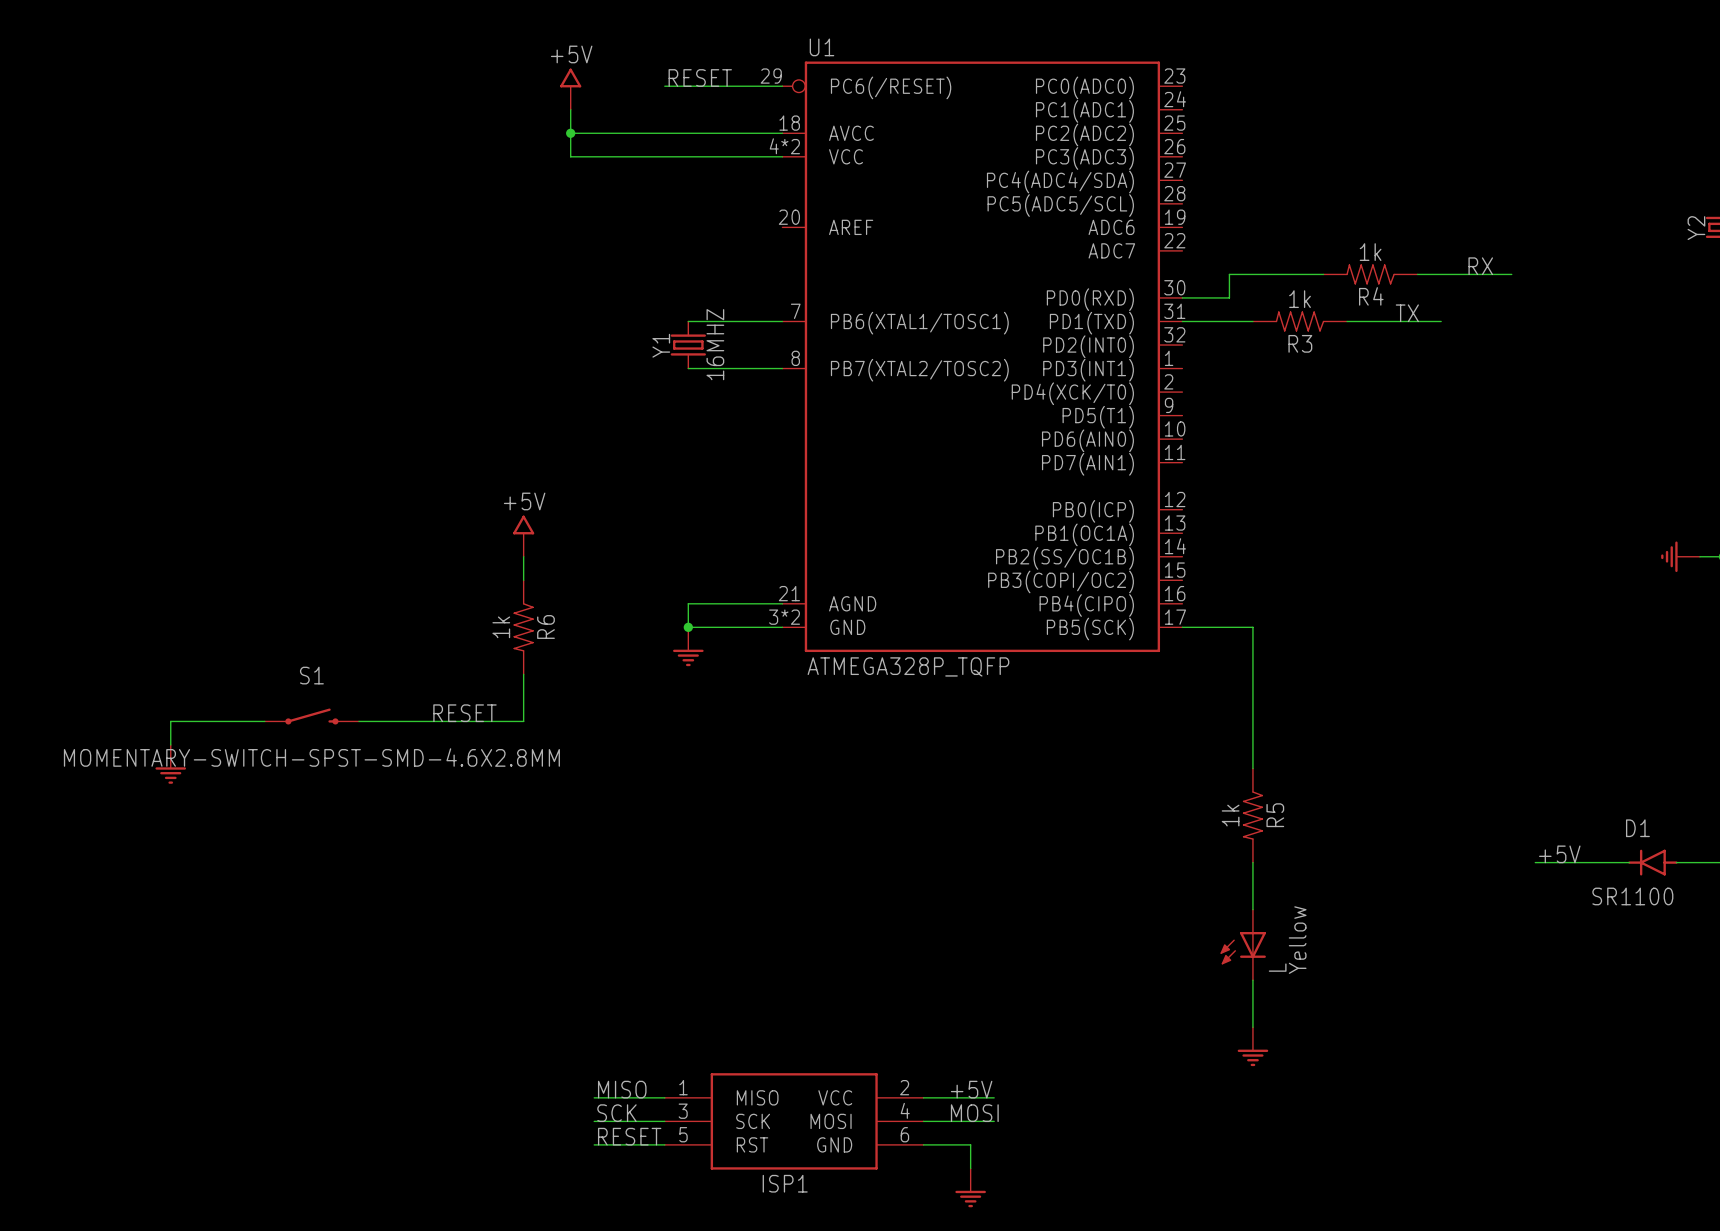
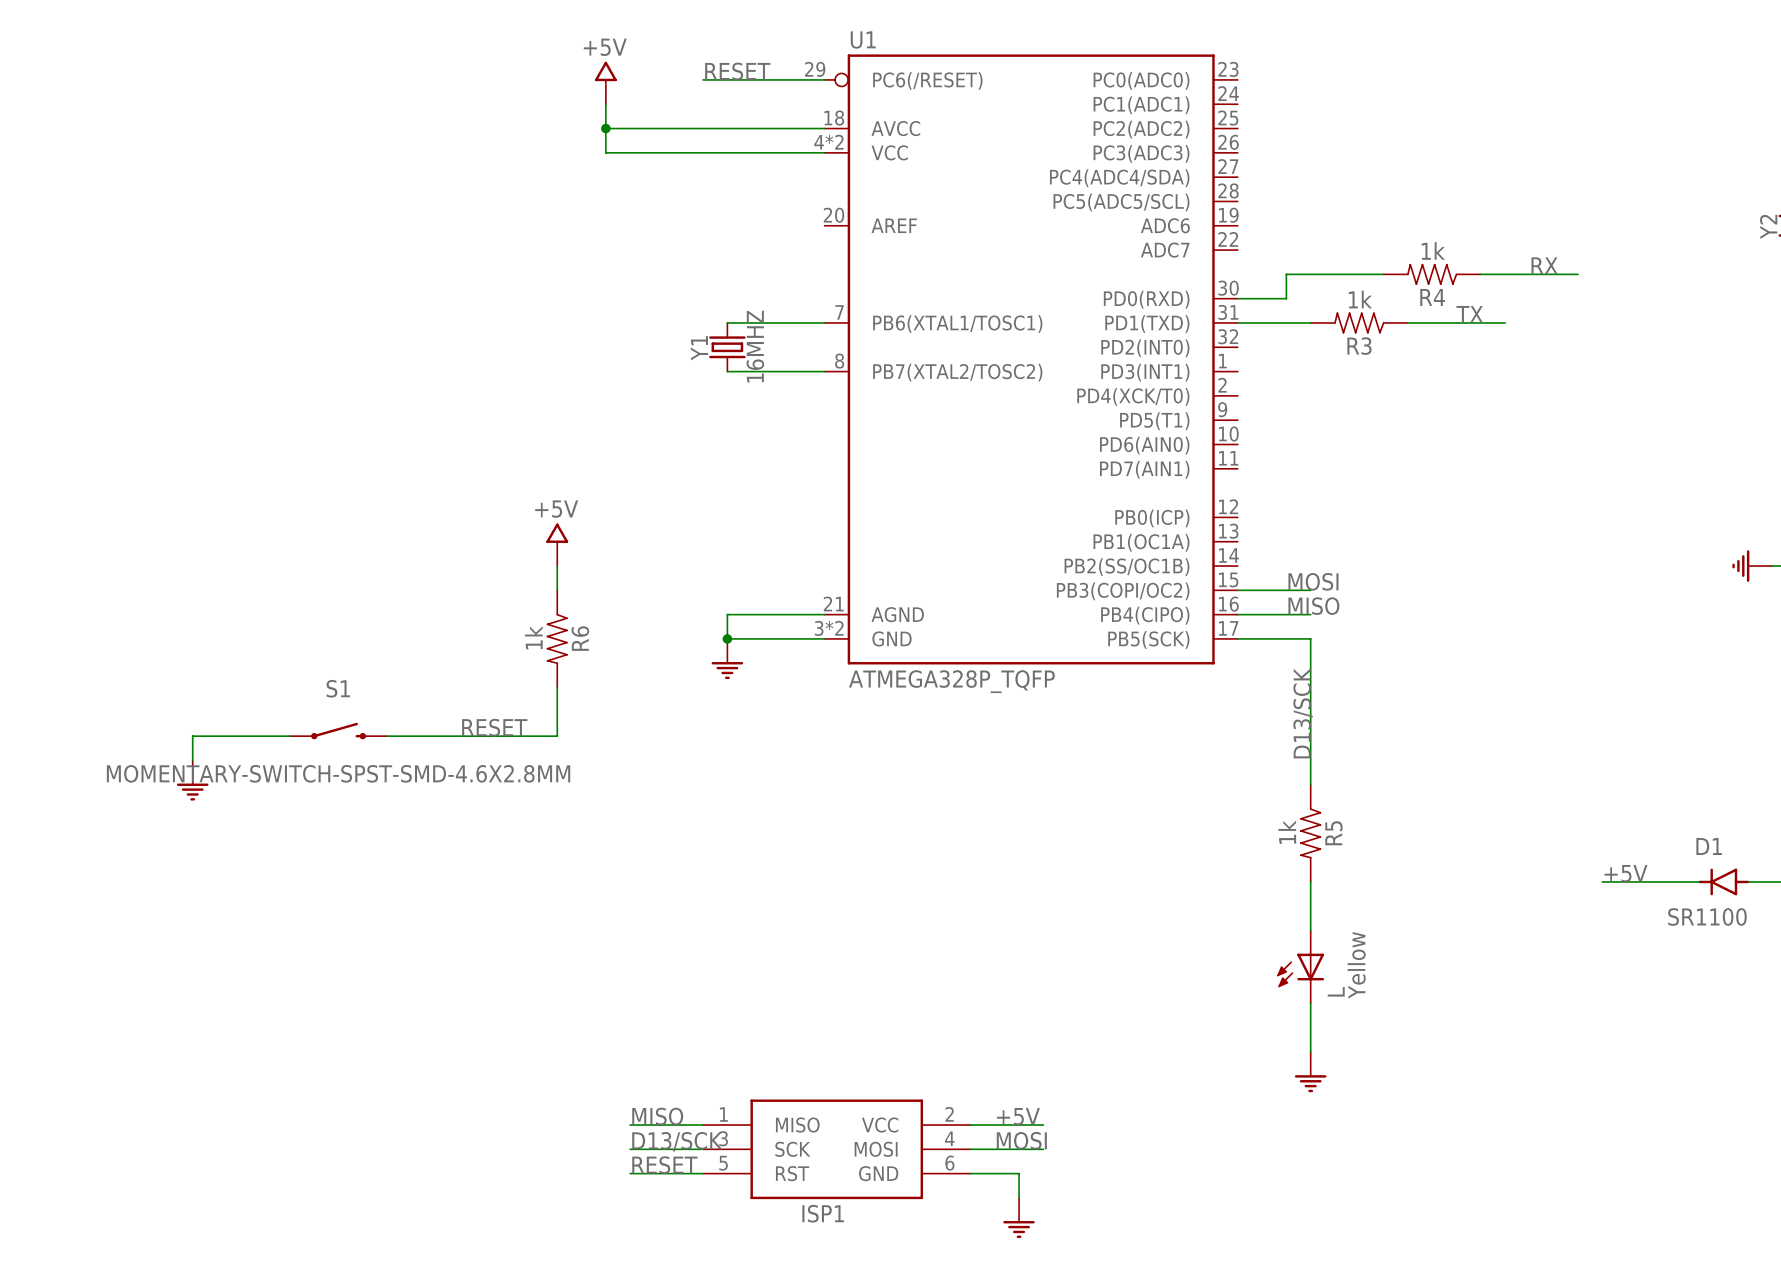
label: none -> MOSI (1313, 581)
wire: none -> (1237, 590) (1310, 590)
label: none -> MISO (1313, 606)
wire: none -> (1237, 614) (1310, 614)
label: none -> D13/SCK (1303, 713)
label: SCK (616, 1113) -> D13/SCK (677, 1141)

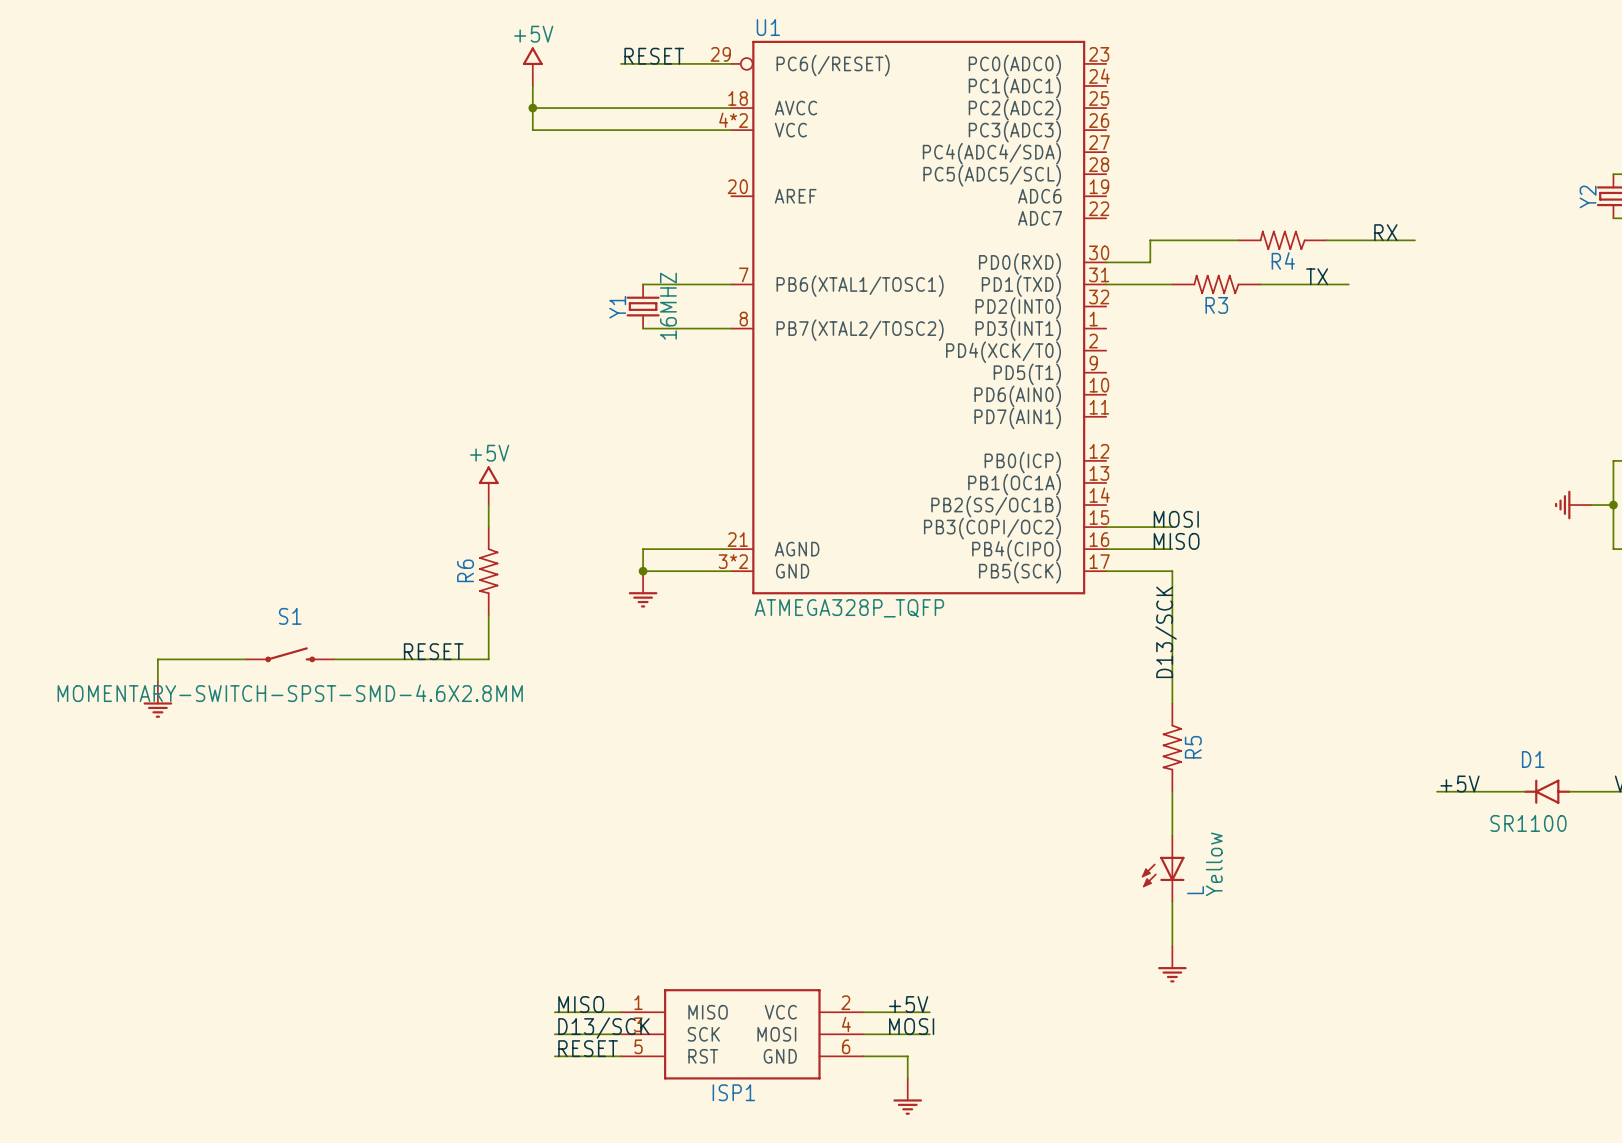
R4 value: 1k (1433, 250) -> none
R3 value: 1k (1360, 299) -> none
R6 value: 1k (533, 637) -> none
R6 name position: R6 (580, 638) -> R6 (465, 570)
R5 value: 1k (1287, 832) -> none

